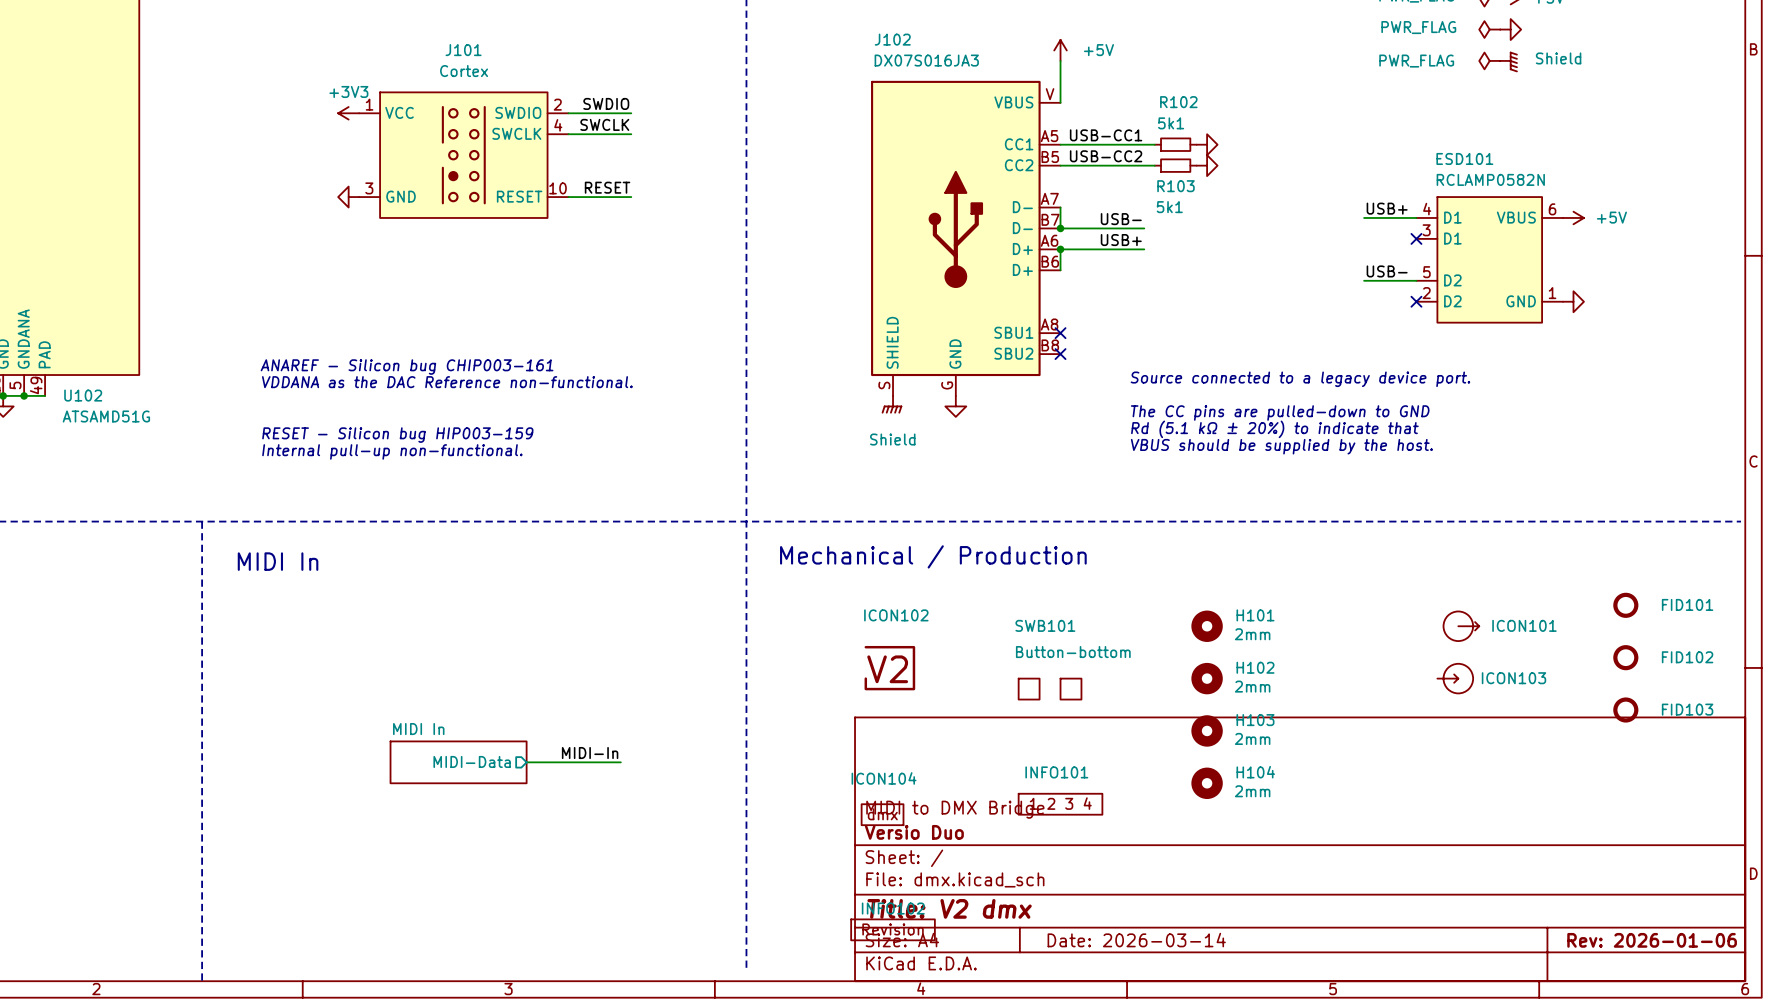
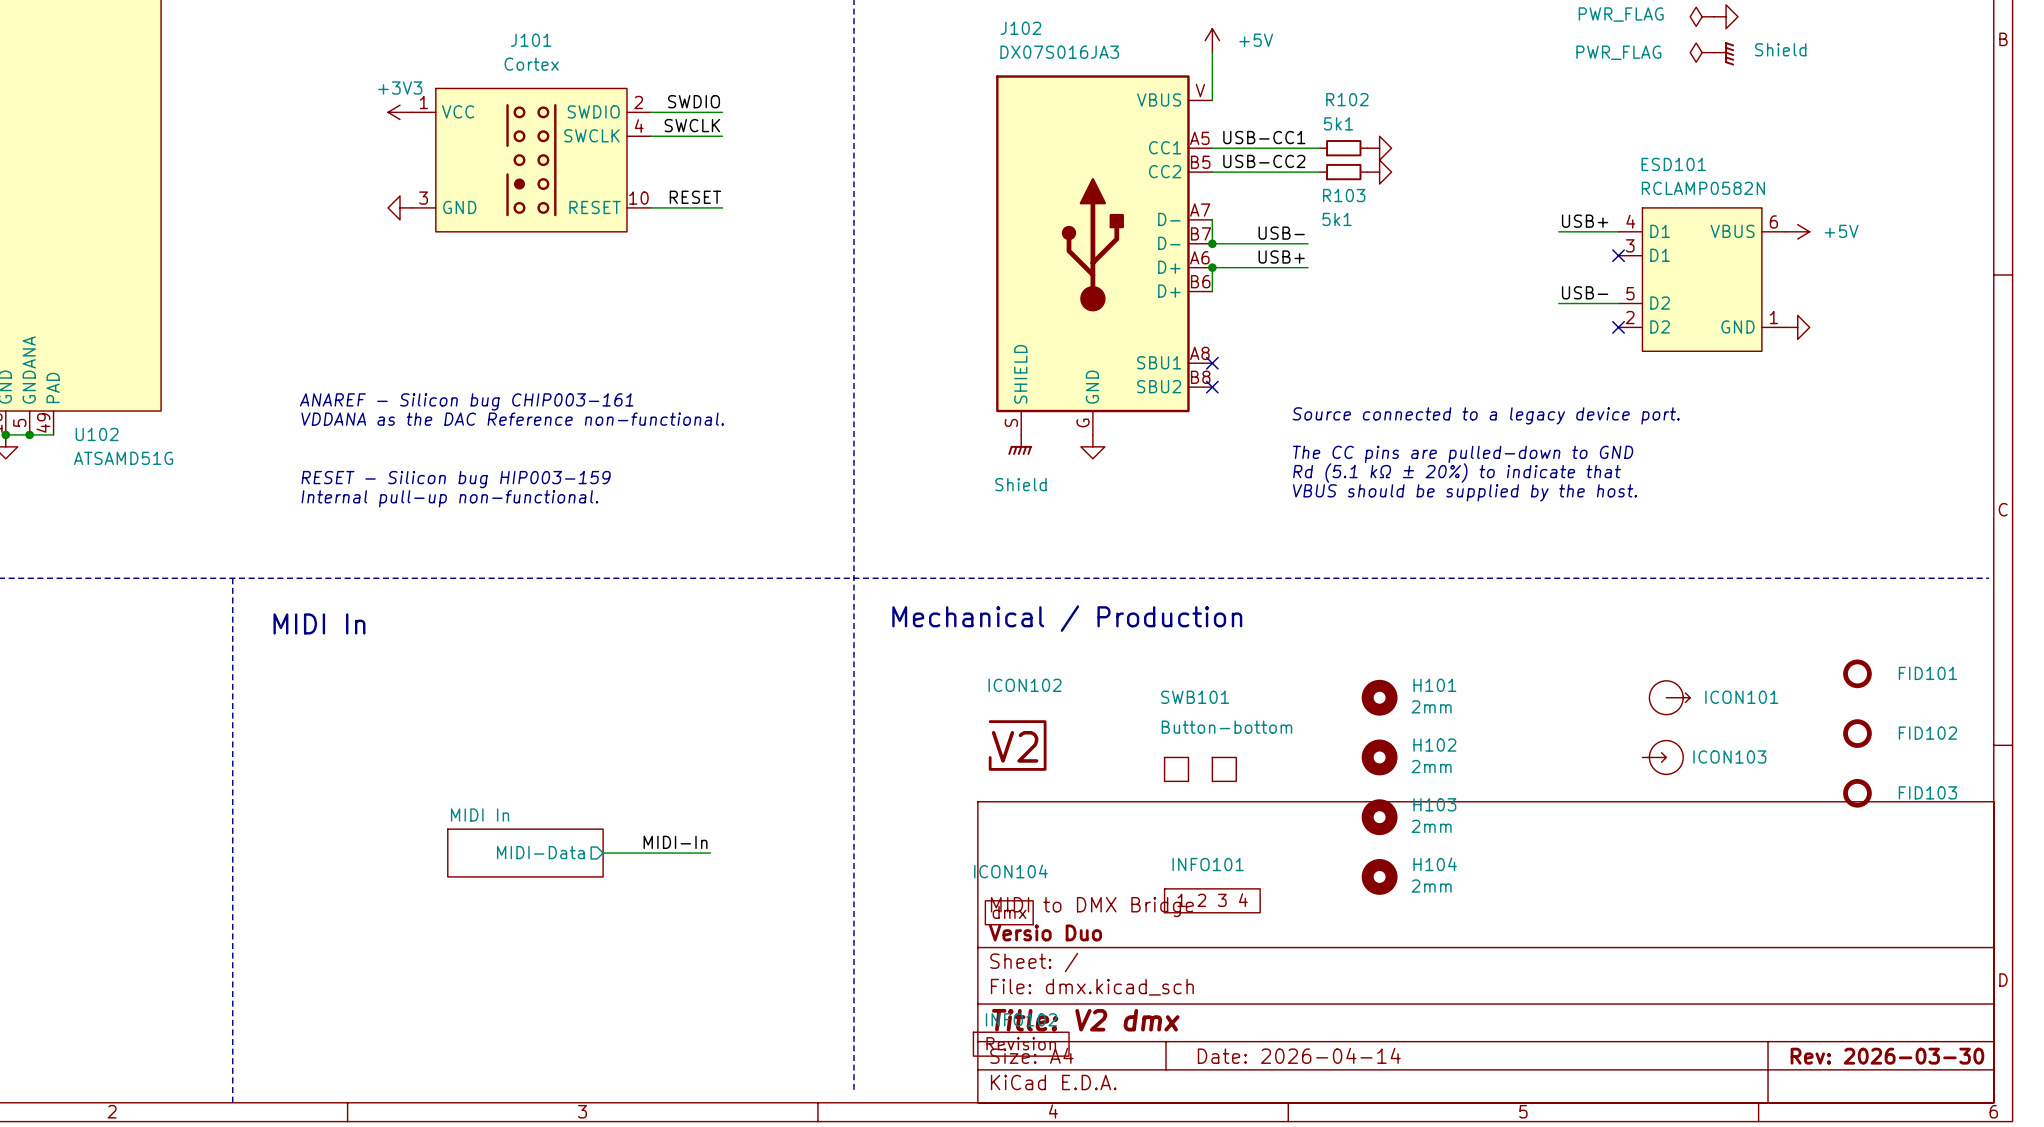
title block: Date: 2026-03-14 (1136, 940) -> Date: 2026-04-14 (1299, 1055)
title block: Rev: 2026-01-06 (1652, 940) -> Rev: 2026-03-30 (1887, 1056)

